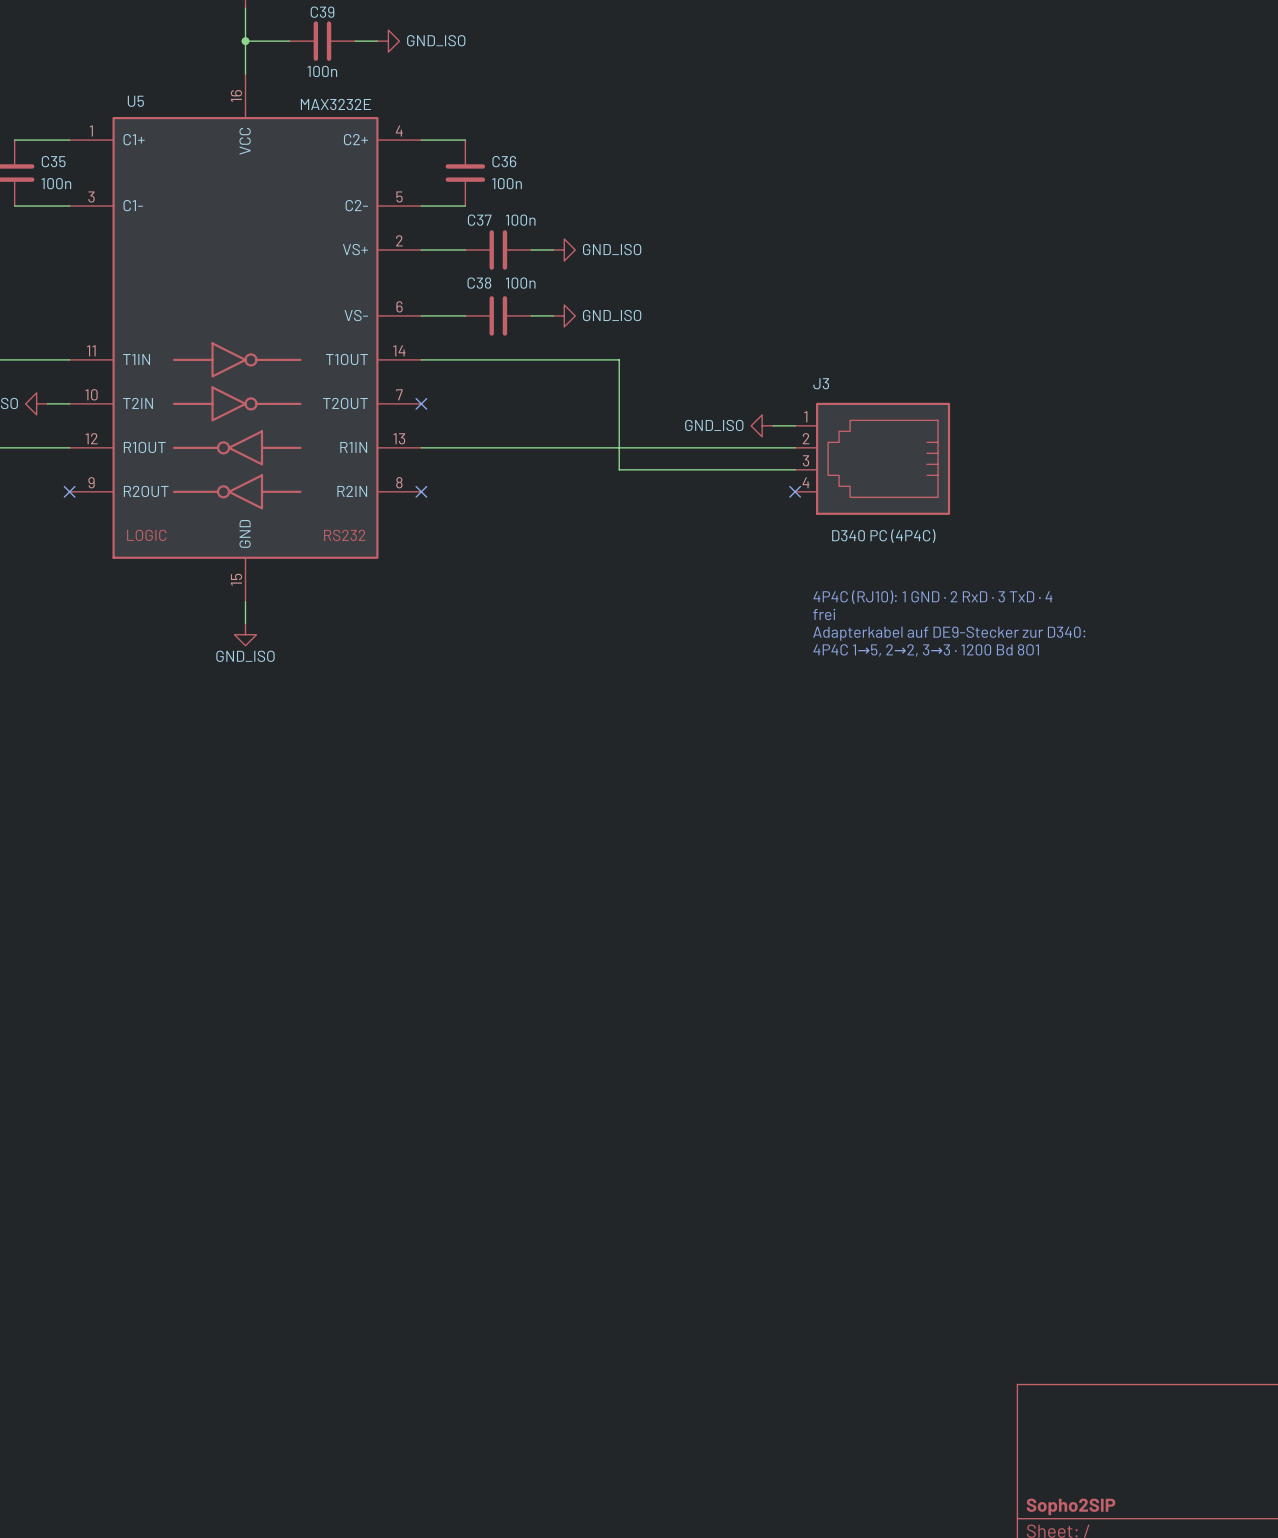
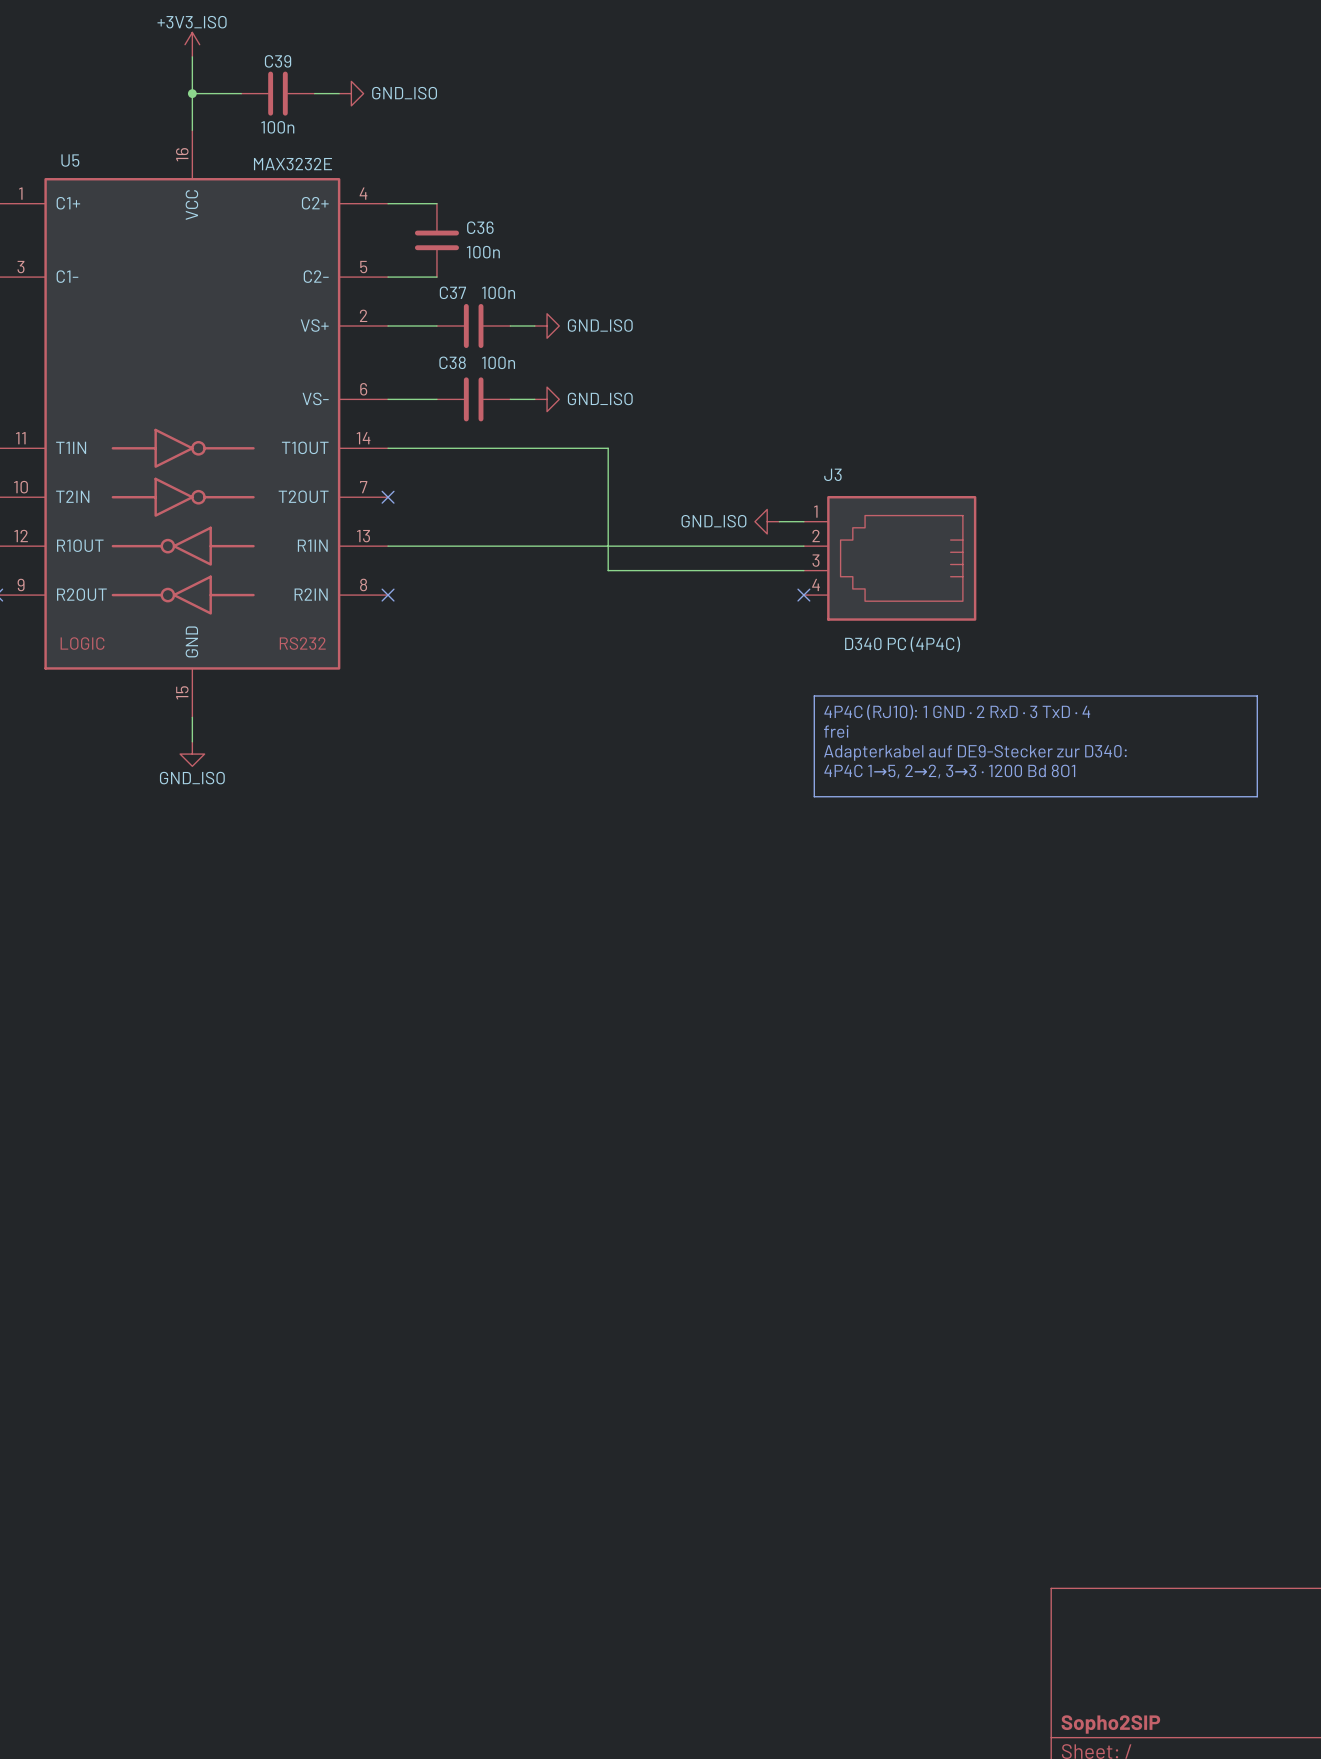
line: none -> (814, 696) (1257, 696) (1257, 796) (814, 796) (814, 696)

